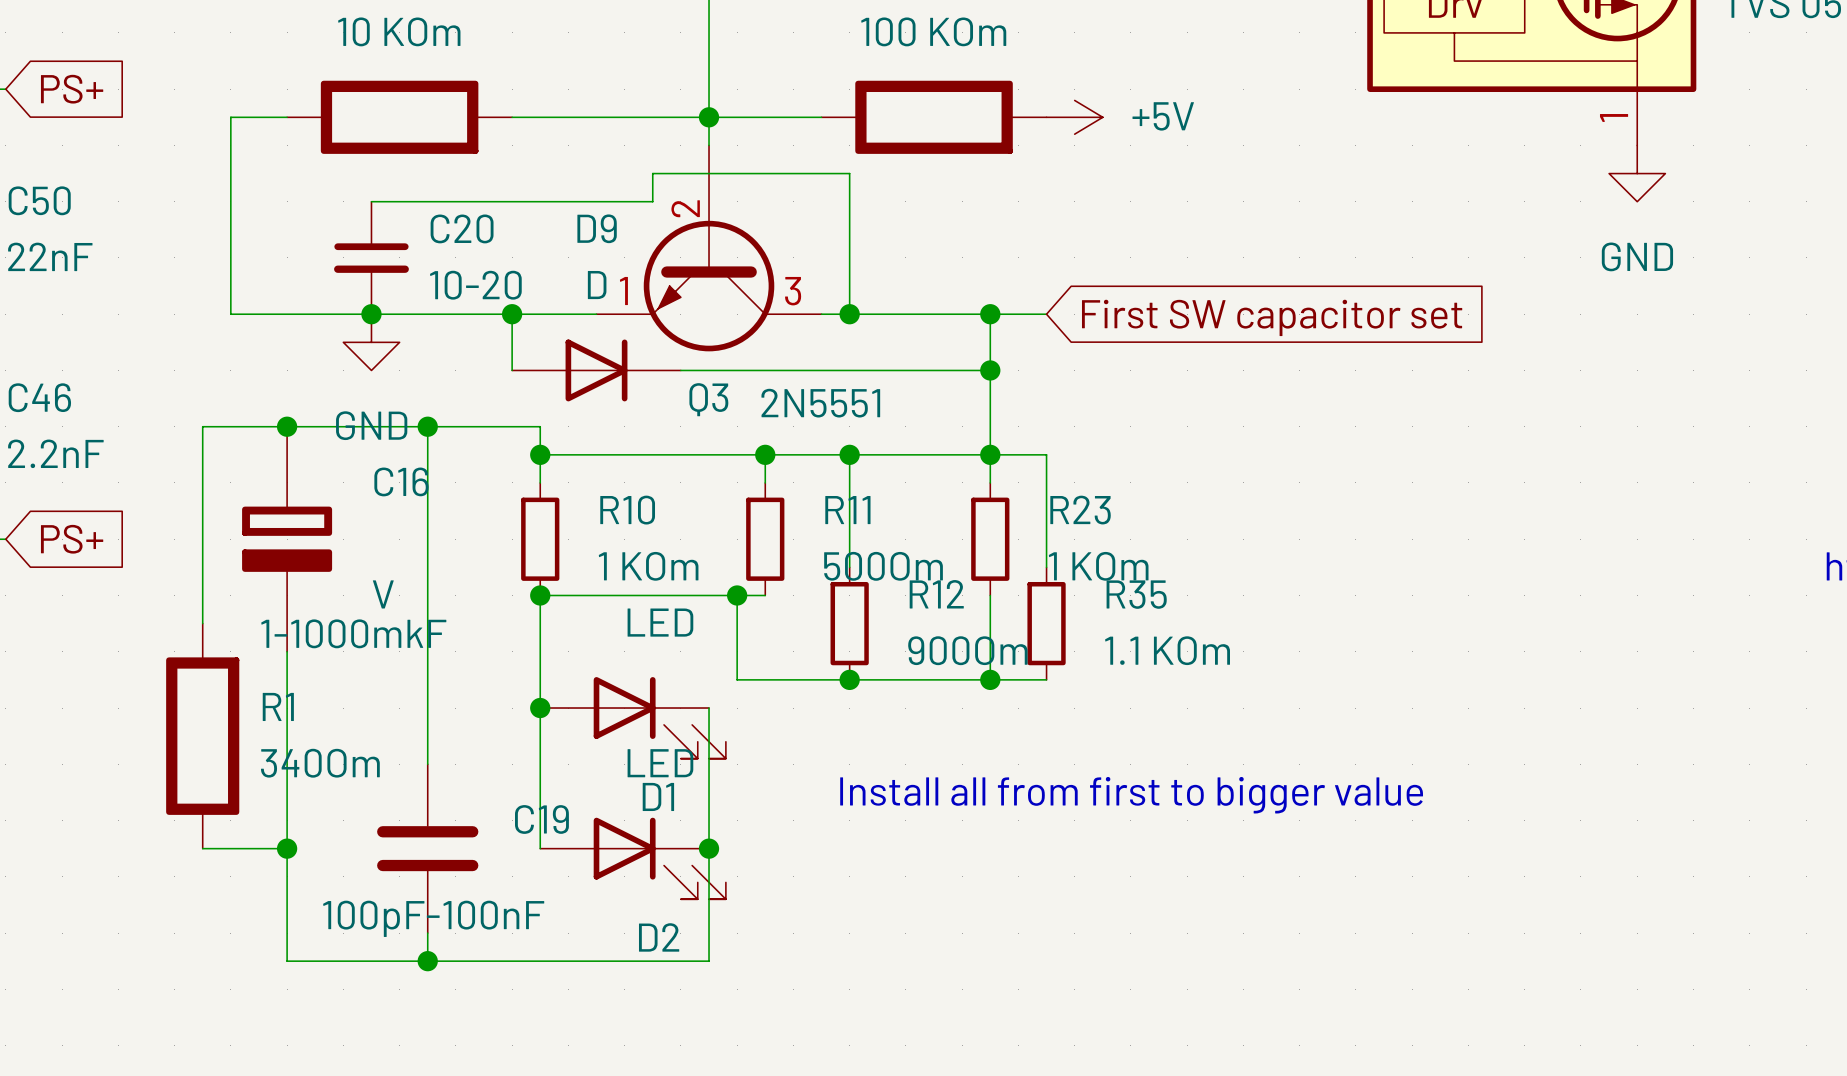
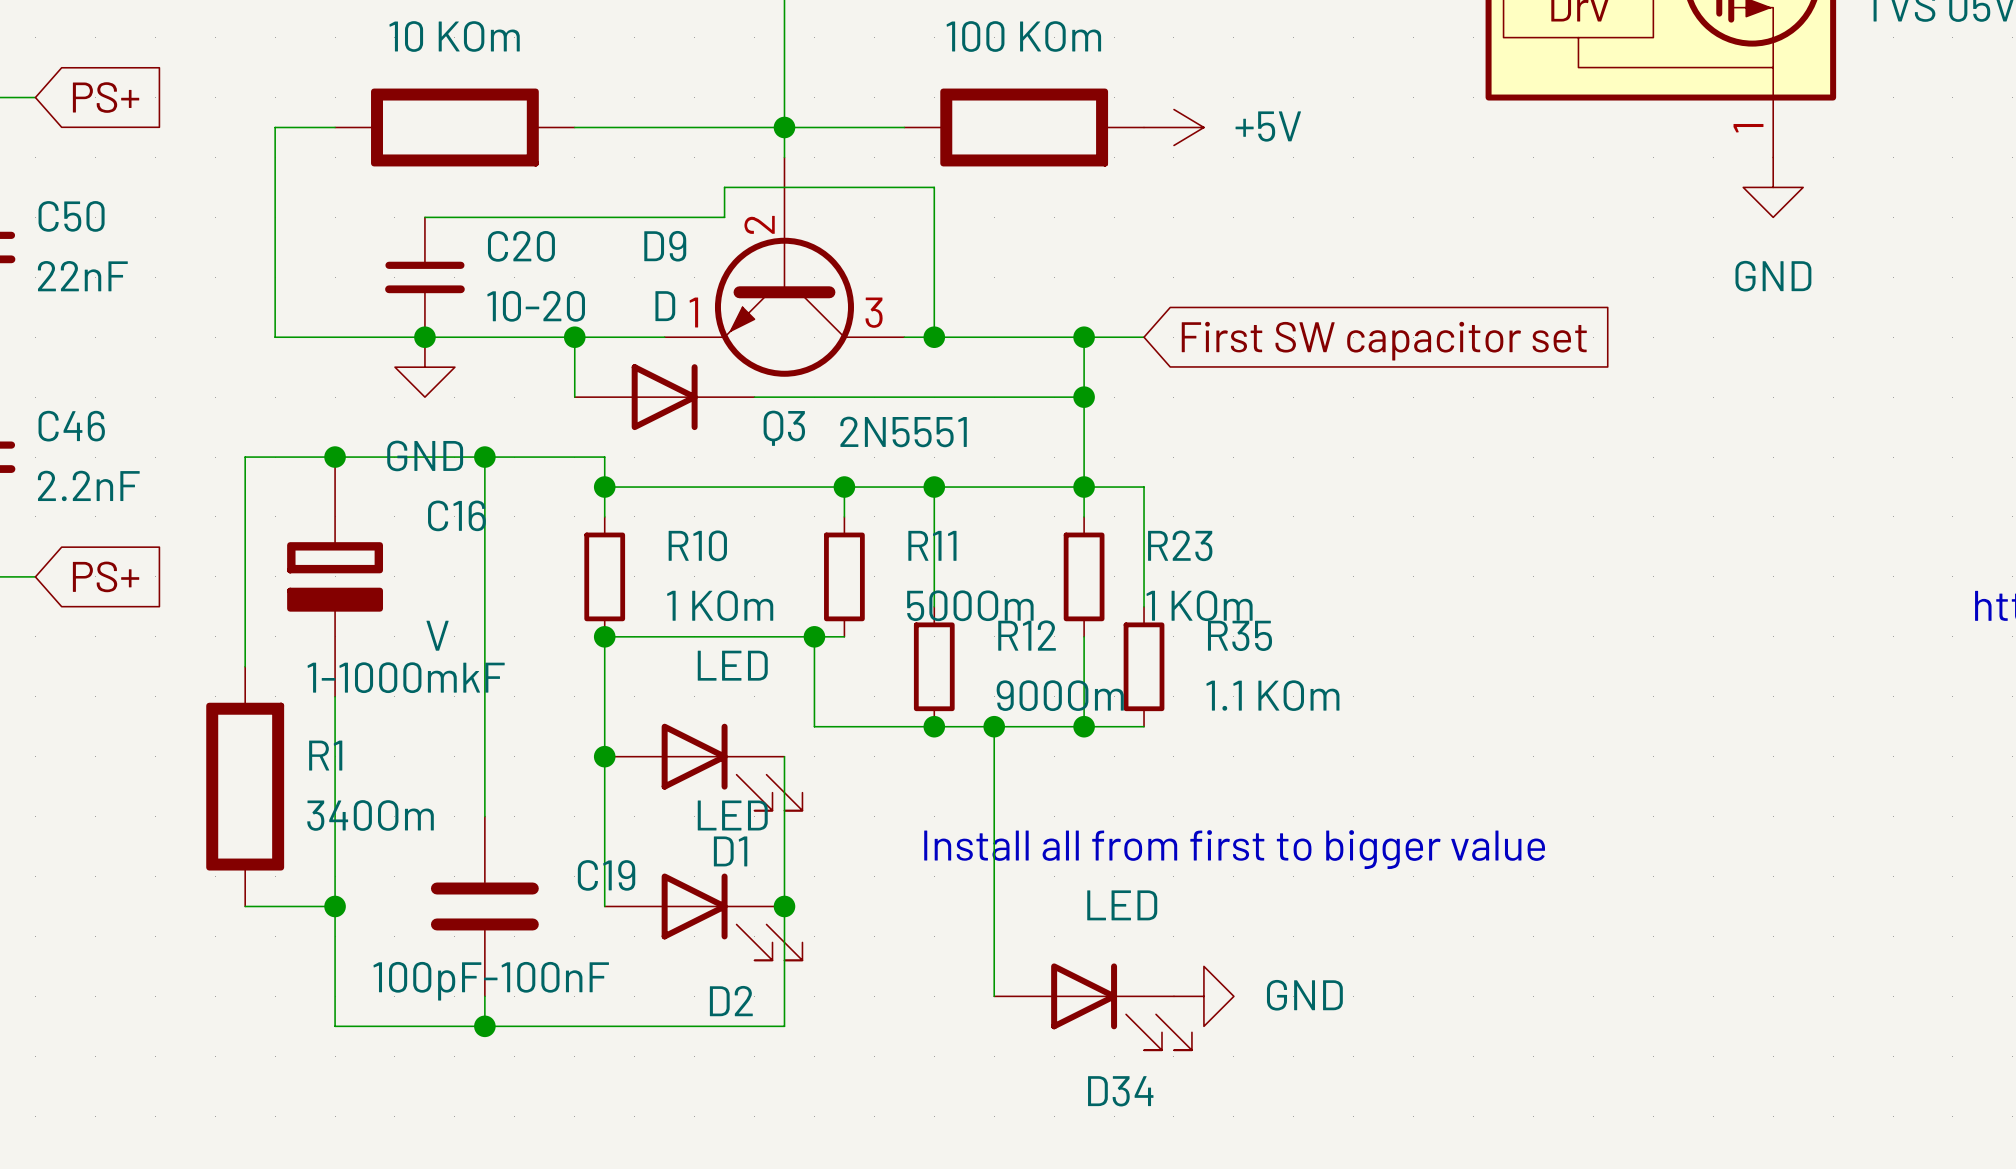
wire: none -> (994, 726) (994, 996)
junction: none -> (994, 726)
power symbol: none -> GND (1203, 996)
D34: none -> LED (1093, 1006)

